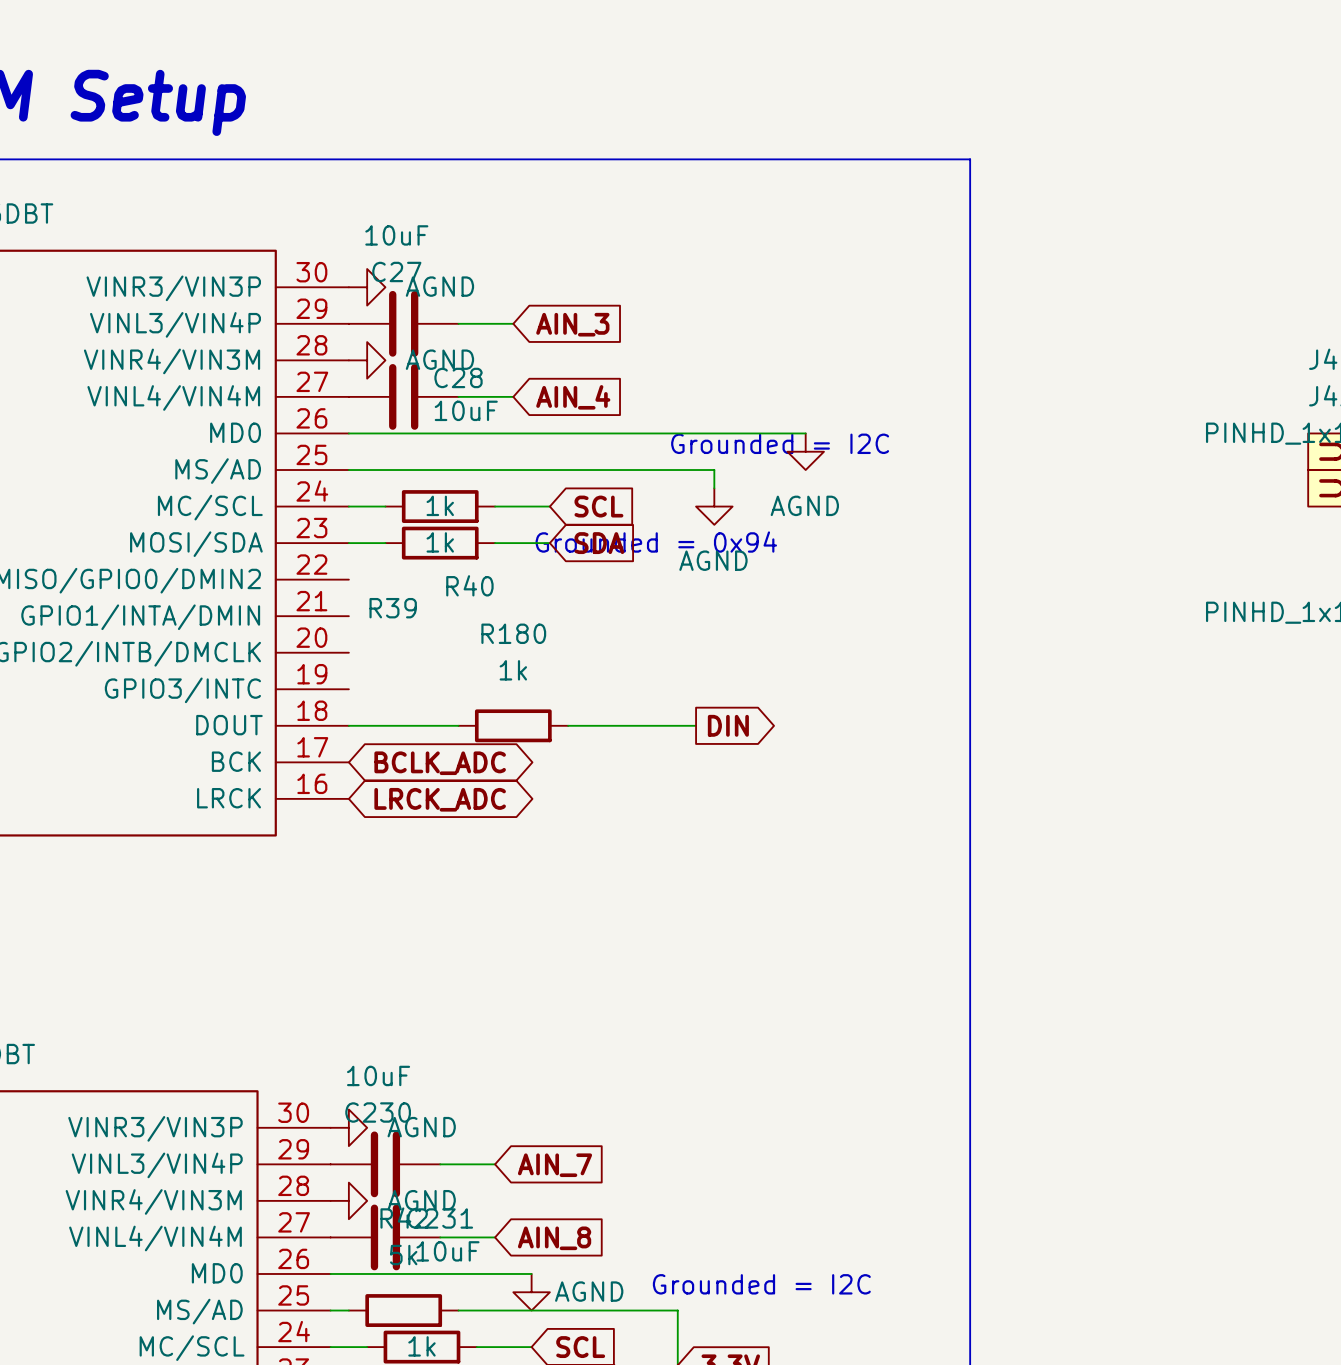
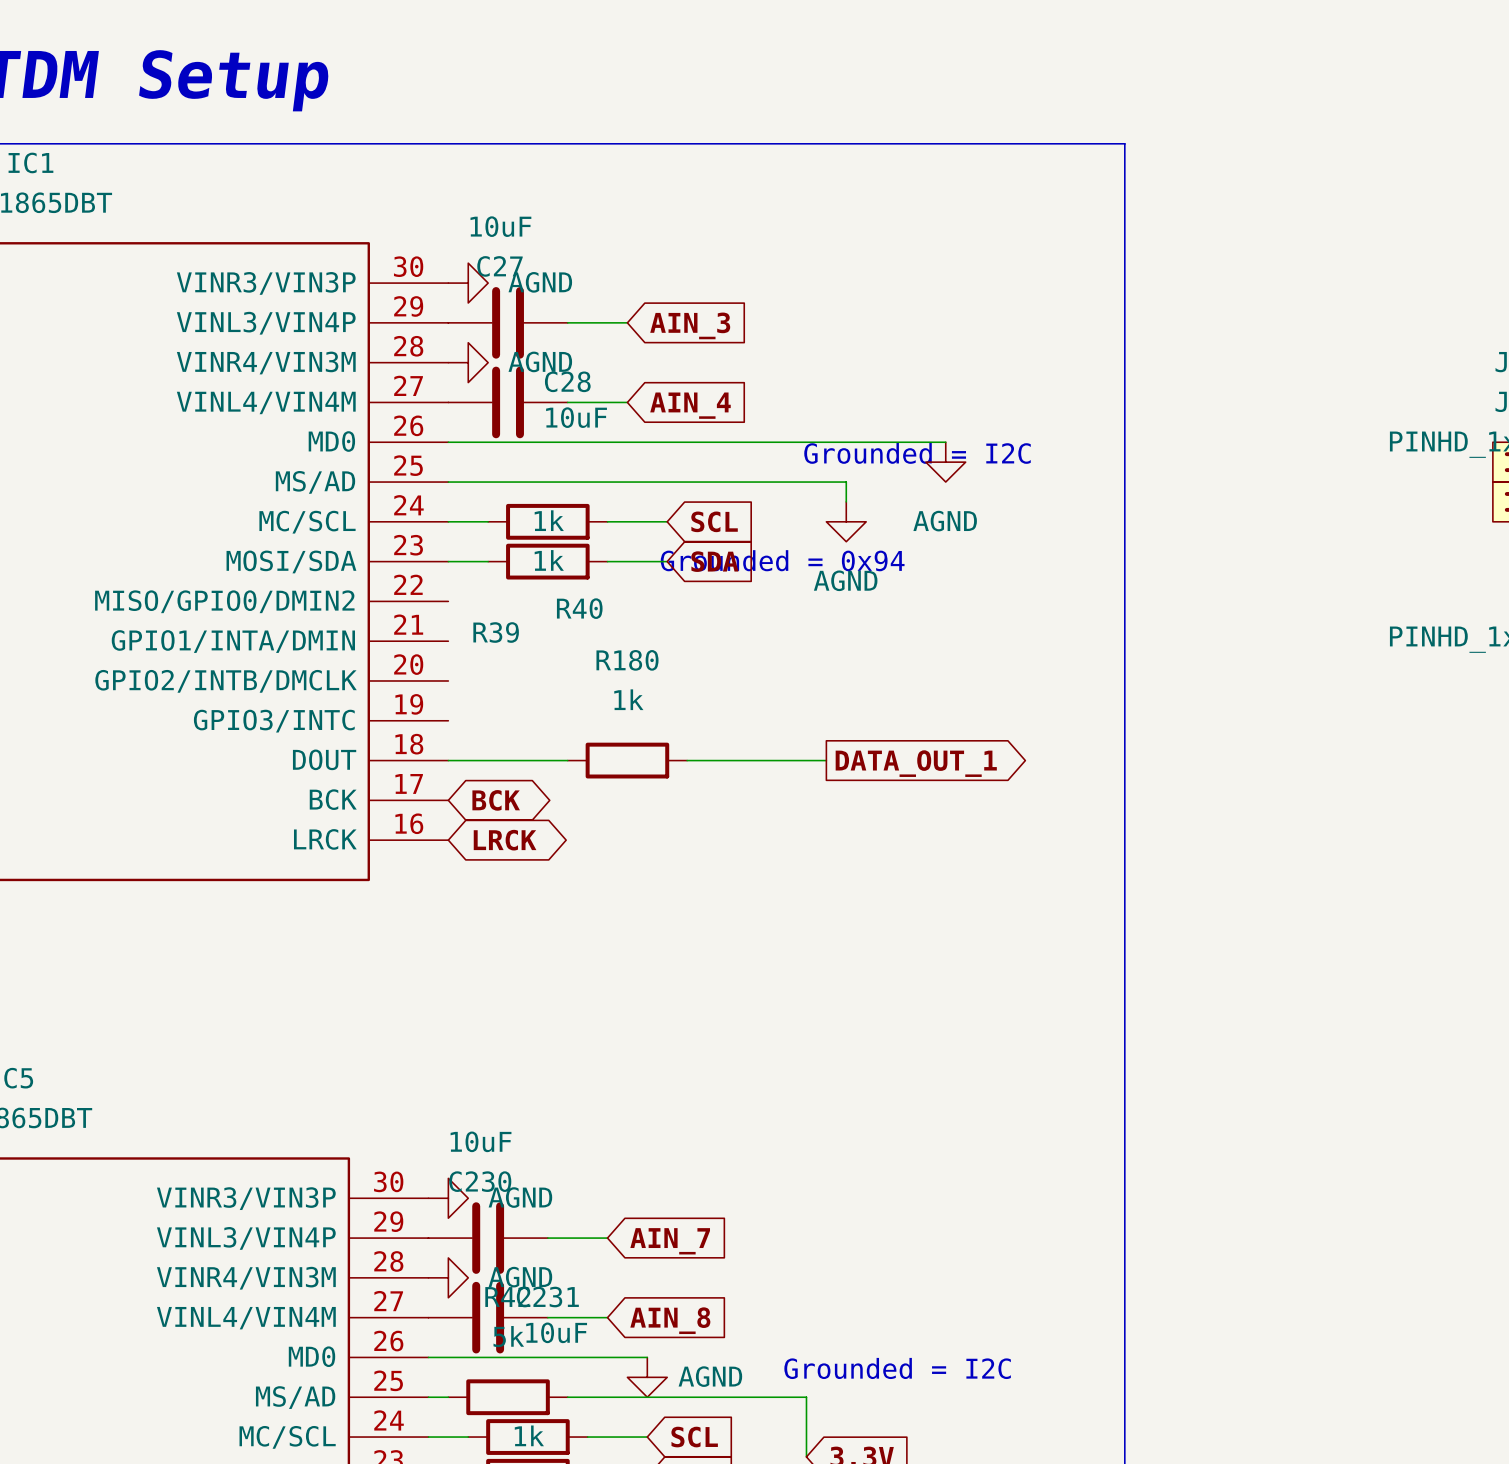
global label: DIN (728, 725) -> DATA_OUT_1 (916, 763)
global label: BCLK_ADC (440, 763) -> BCK (496, 800)
global label: LRCK_ADC (440, 799) -> LRCK (505, 840)

